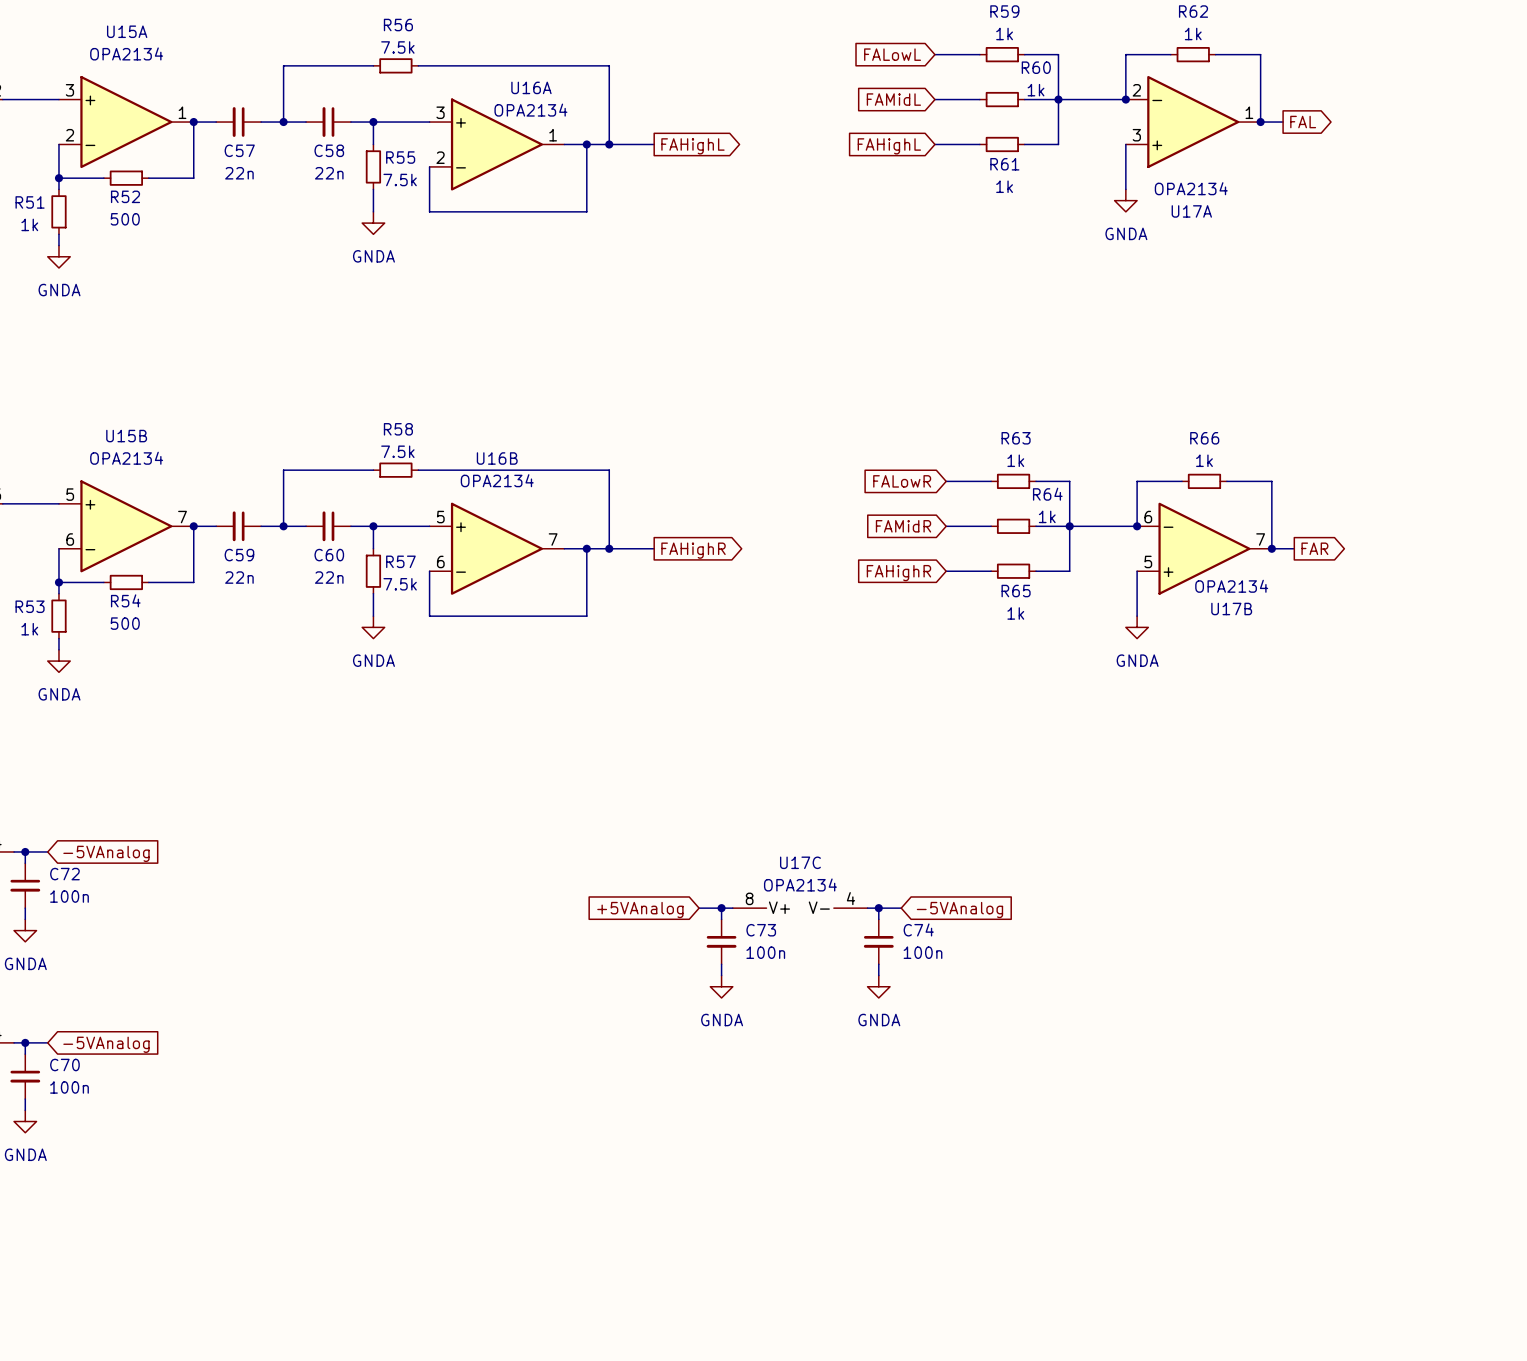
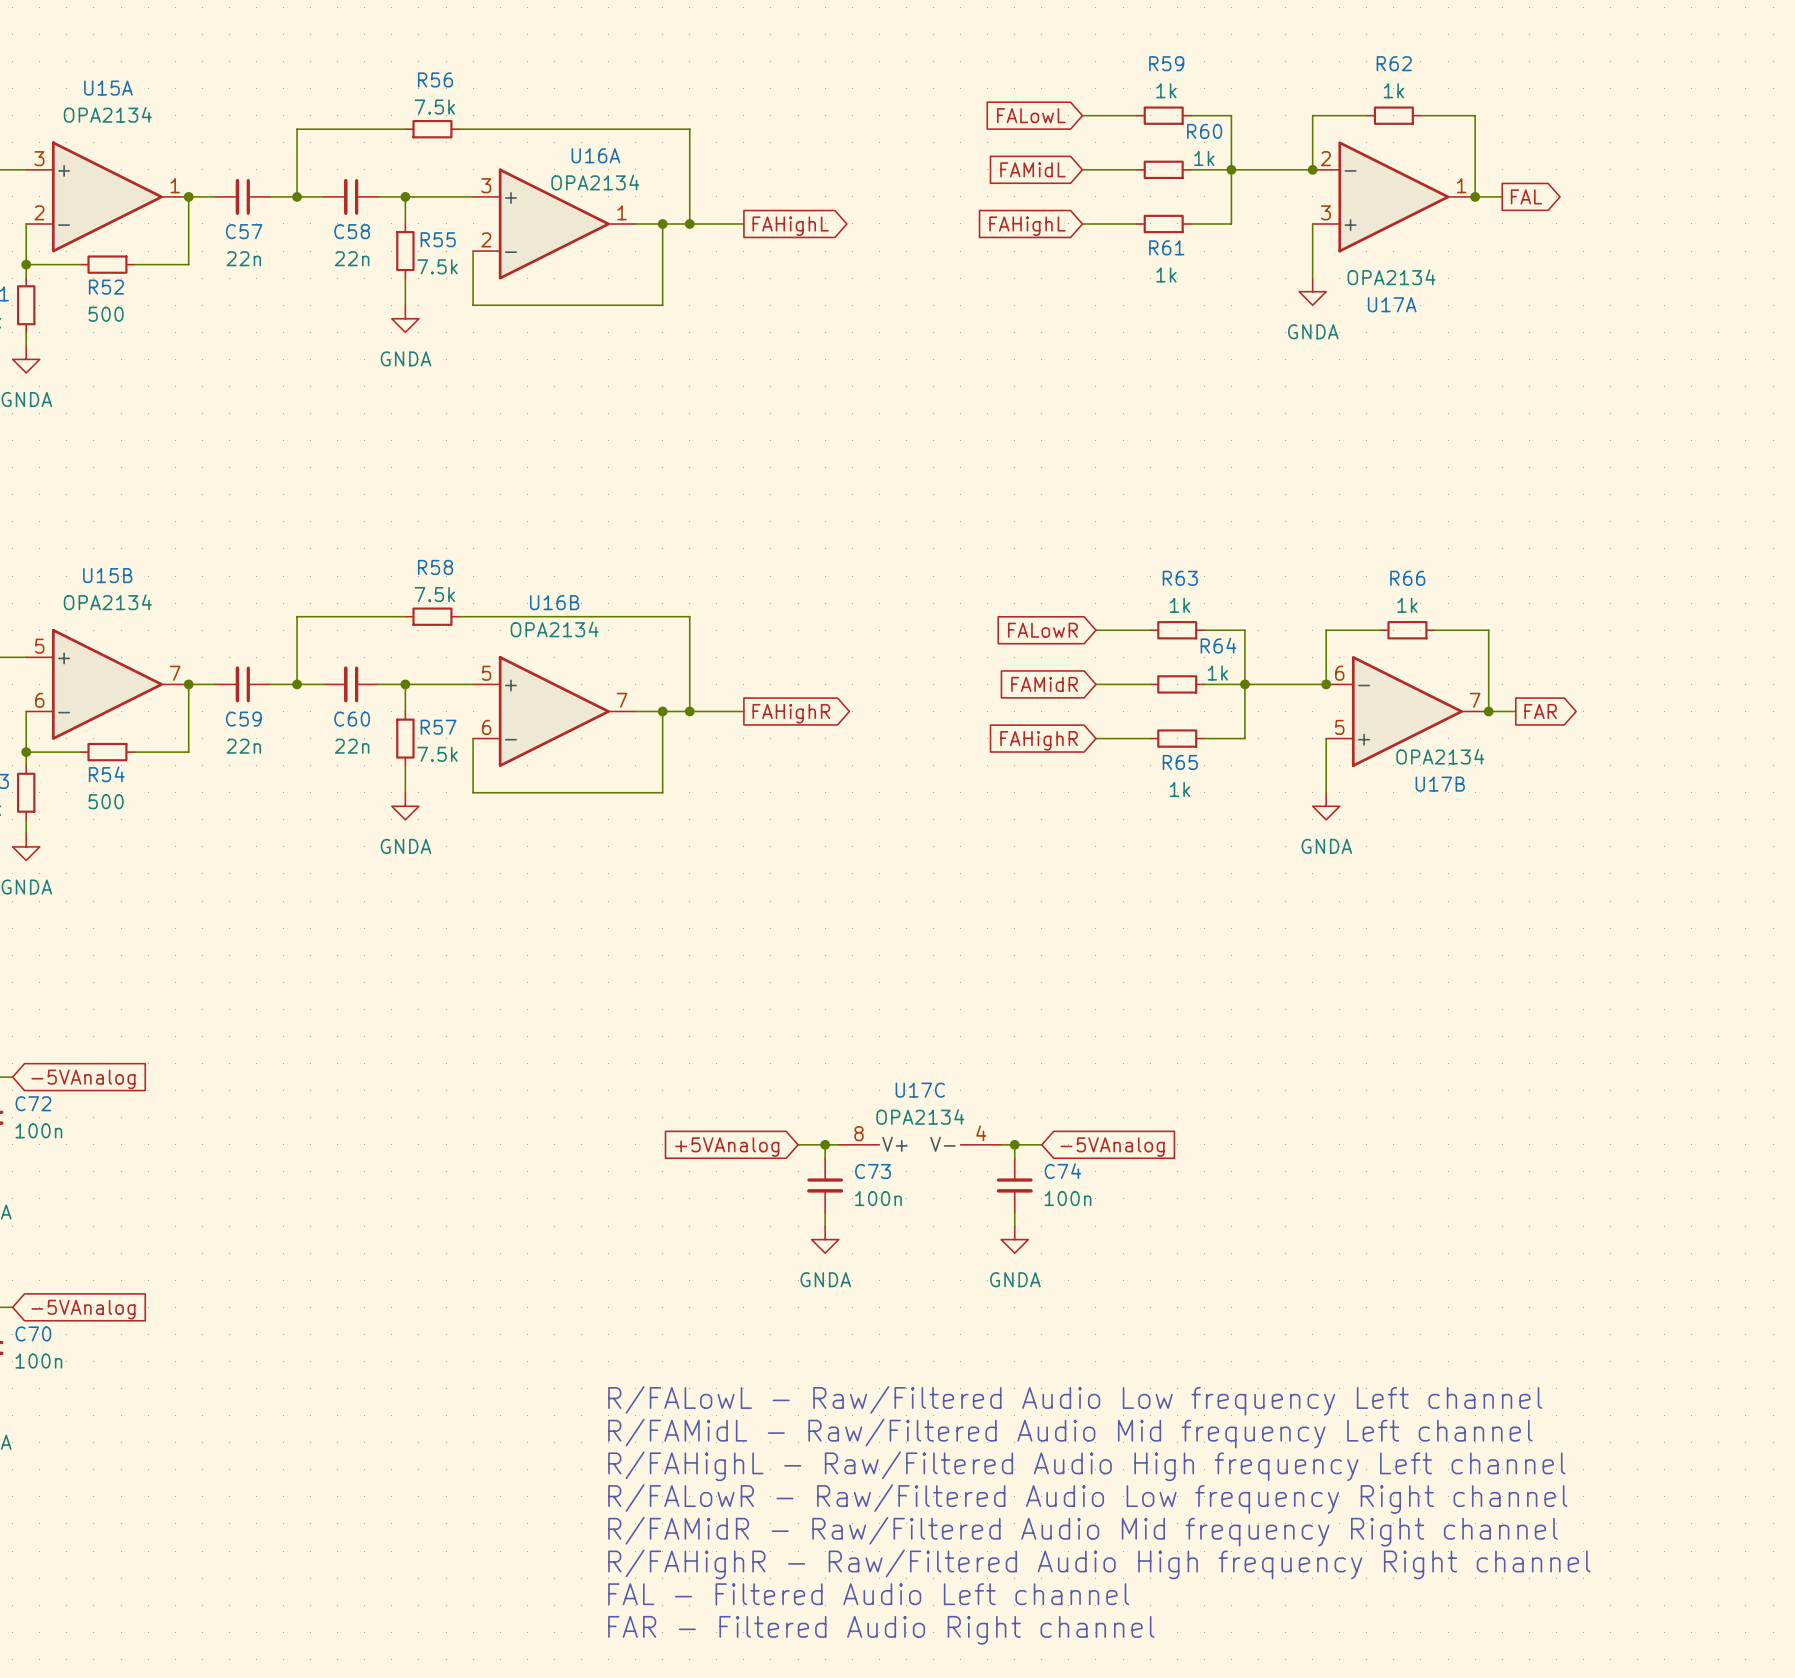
text: none -> R/FALowL - Raw/Filtered Audio Low frequency Left channel (1075, 1400)
text: none -> R/FAMidL - Raw/Filtered Audio Mid frequency Left channel (1070, 1433)
text: none -> R/FAHighL - Raw/Filtered Audio High frequency Left channel (1086, 1466)
text: none -> R/FALowR - Raw/Filtered Audio Low frequency Right channel (1087, 1498)
text: none -> R/FAMidR - Raw/Filtered Audio Mid frequency Right channel (1082, 1531)
text: none -> R/FAHighR - Raw/Filtered Audio High frequency Right channel (1099, 1564)
text: none -> FAL - Filtered Audio Left channel (868, 1594)
text: none -> FAR - Filtered Audio Right channel (881, 1630)

